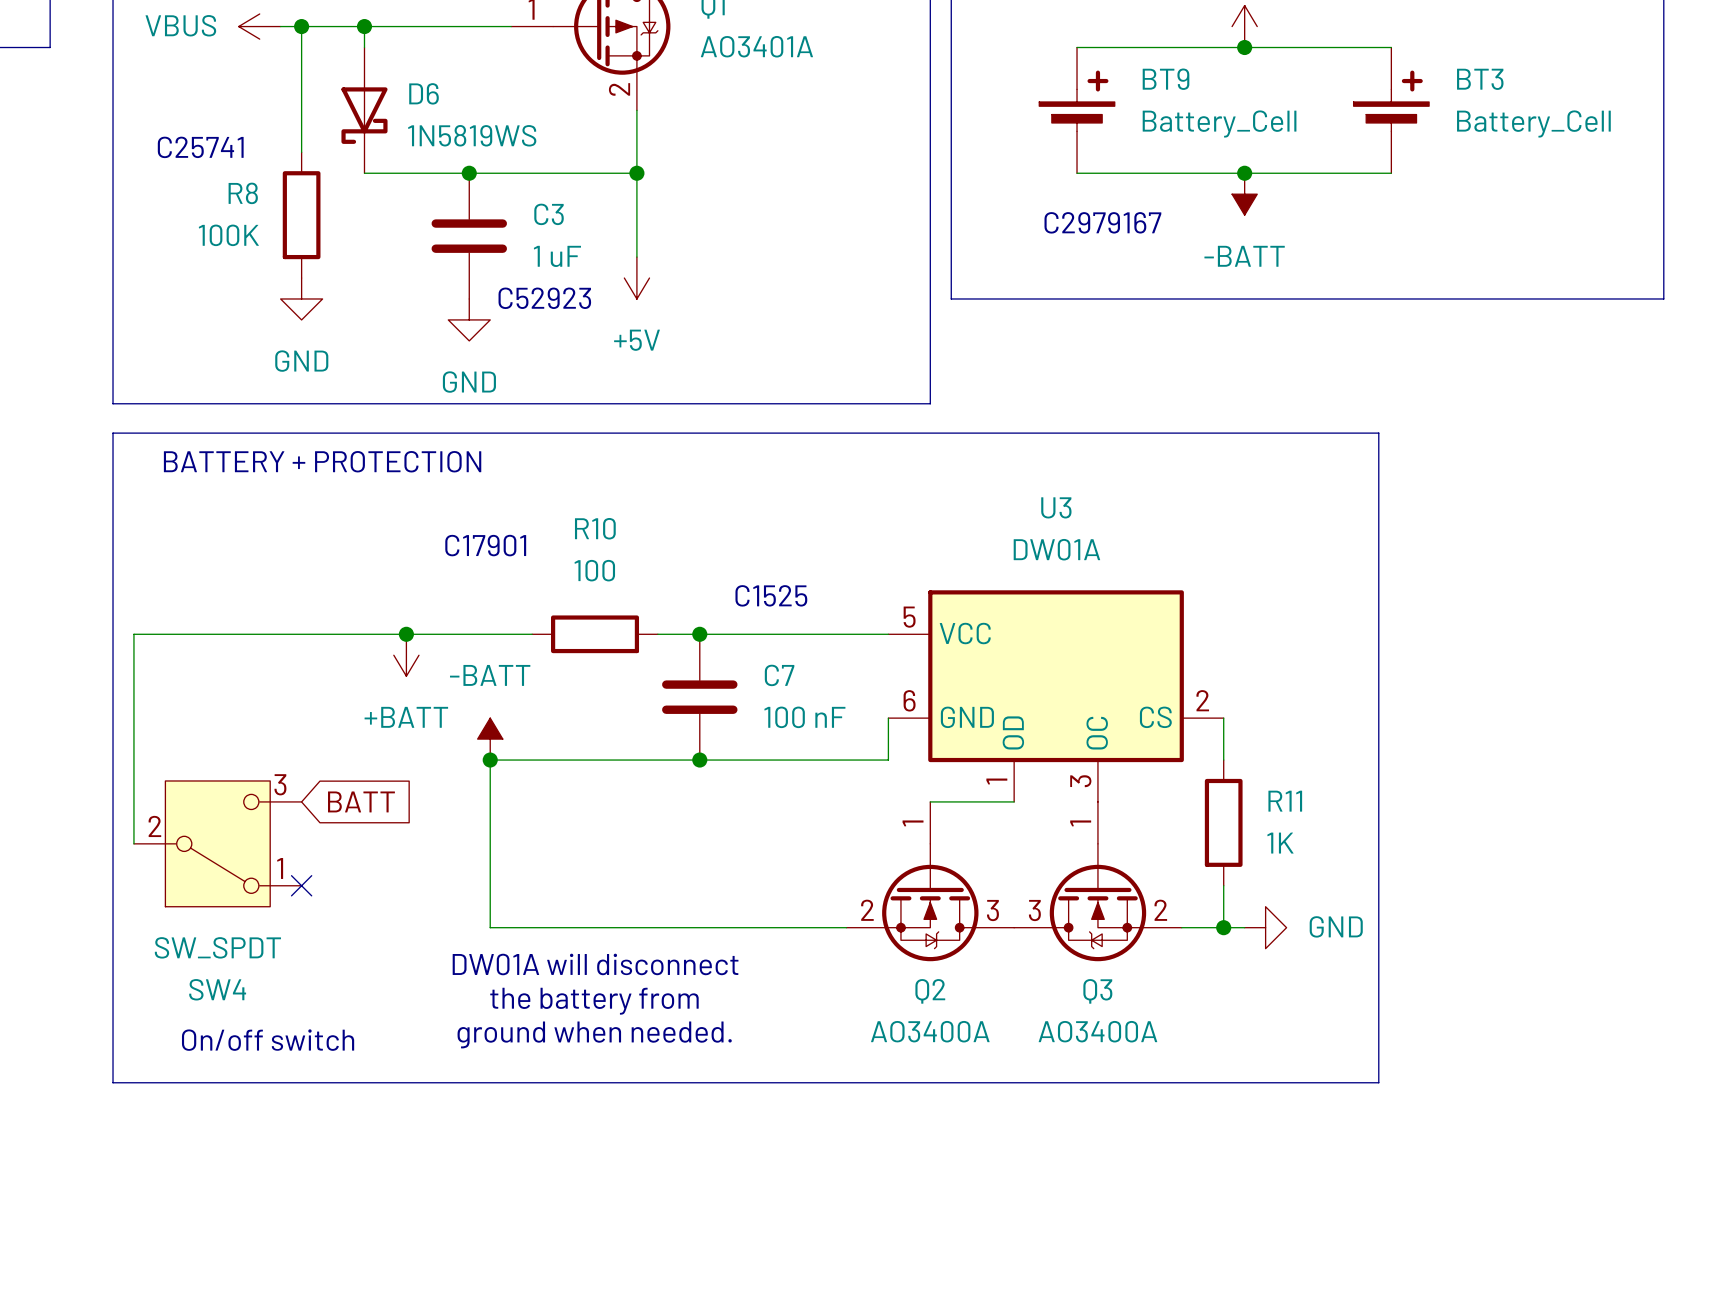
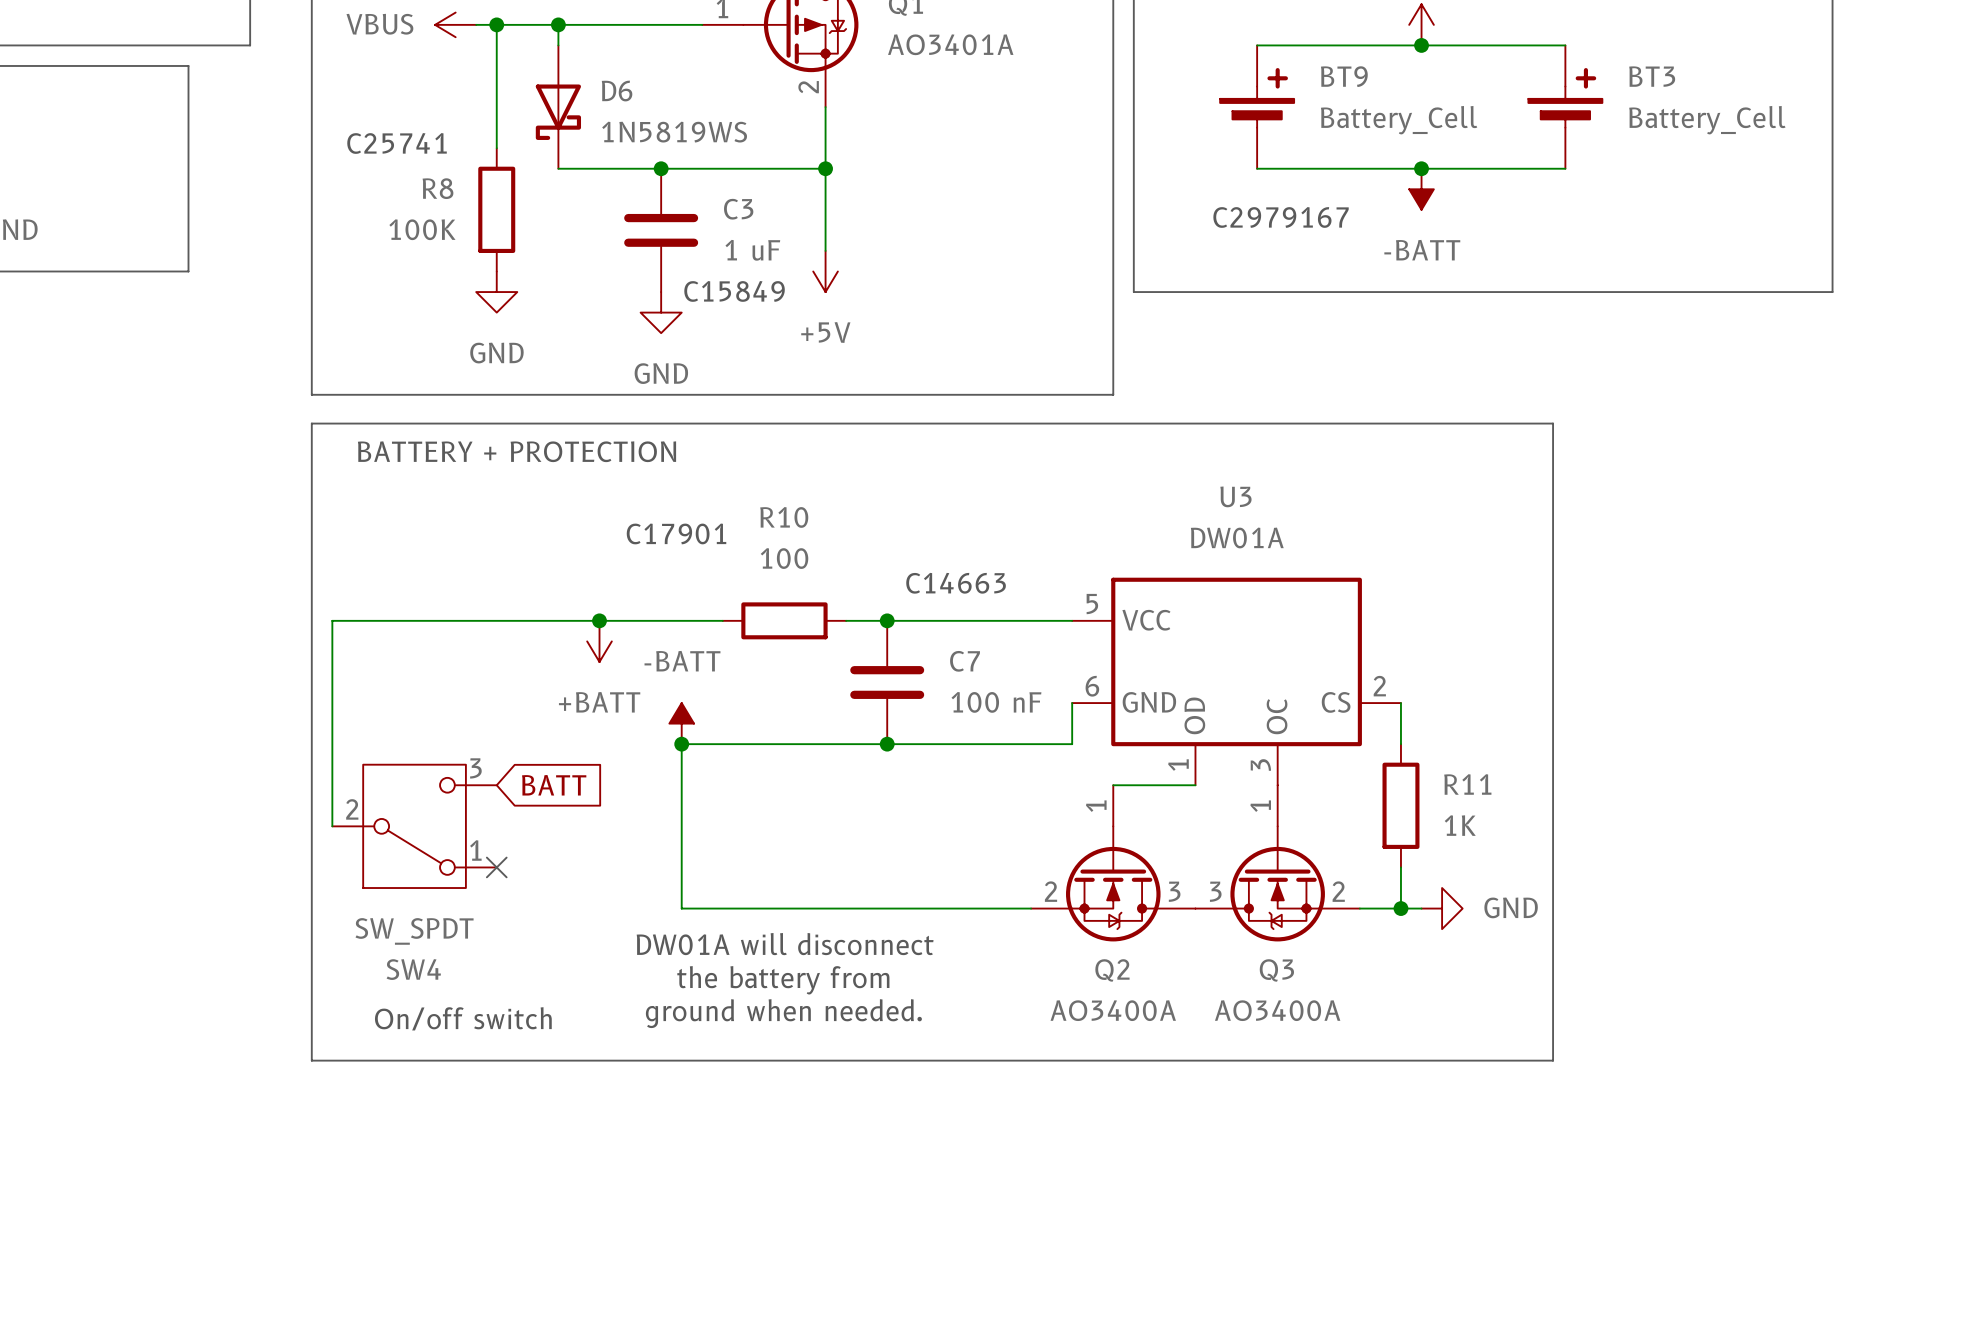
text: C52923 (544, 298) -> C15849 (734, 291)
text: C1525 (771, 595) -> C14663 (956, 583)

